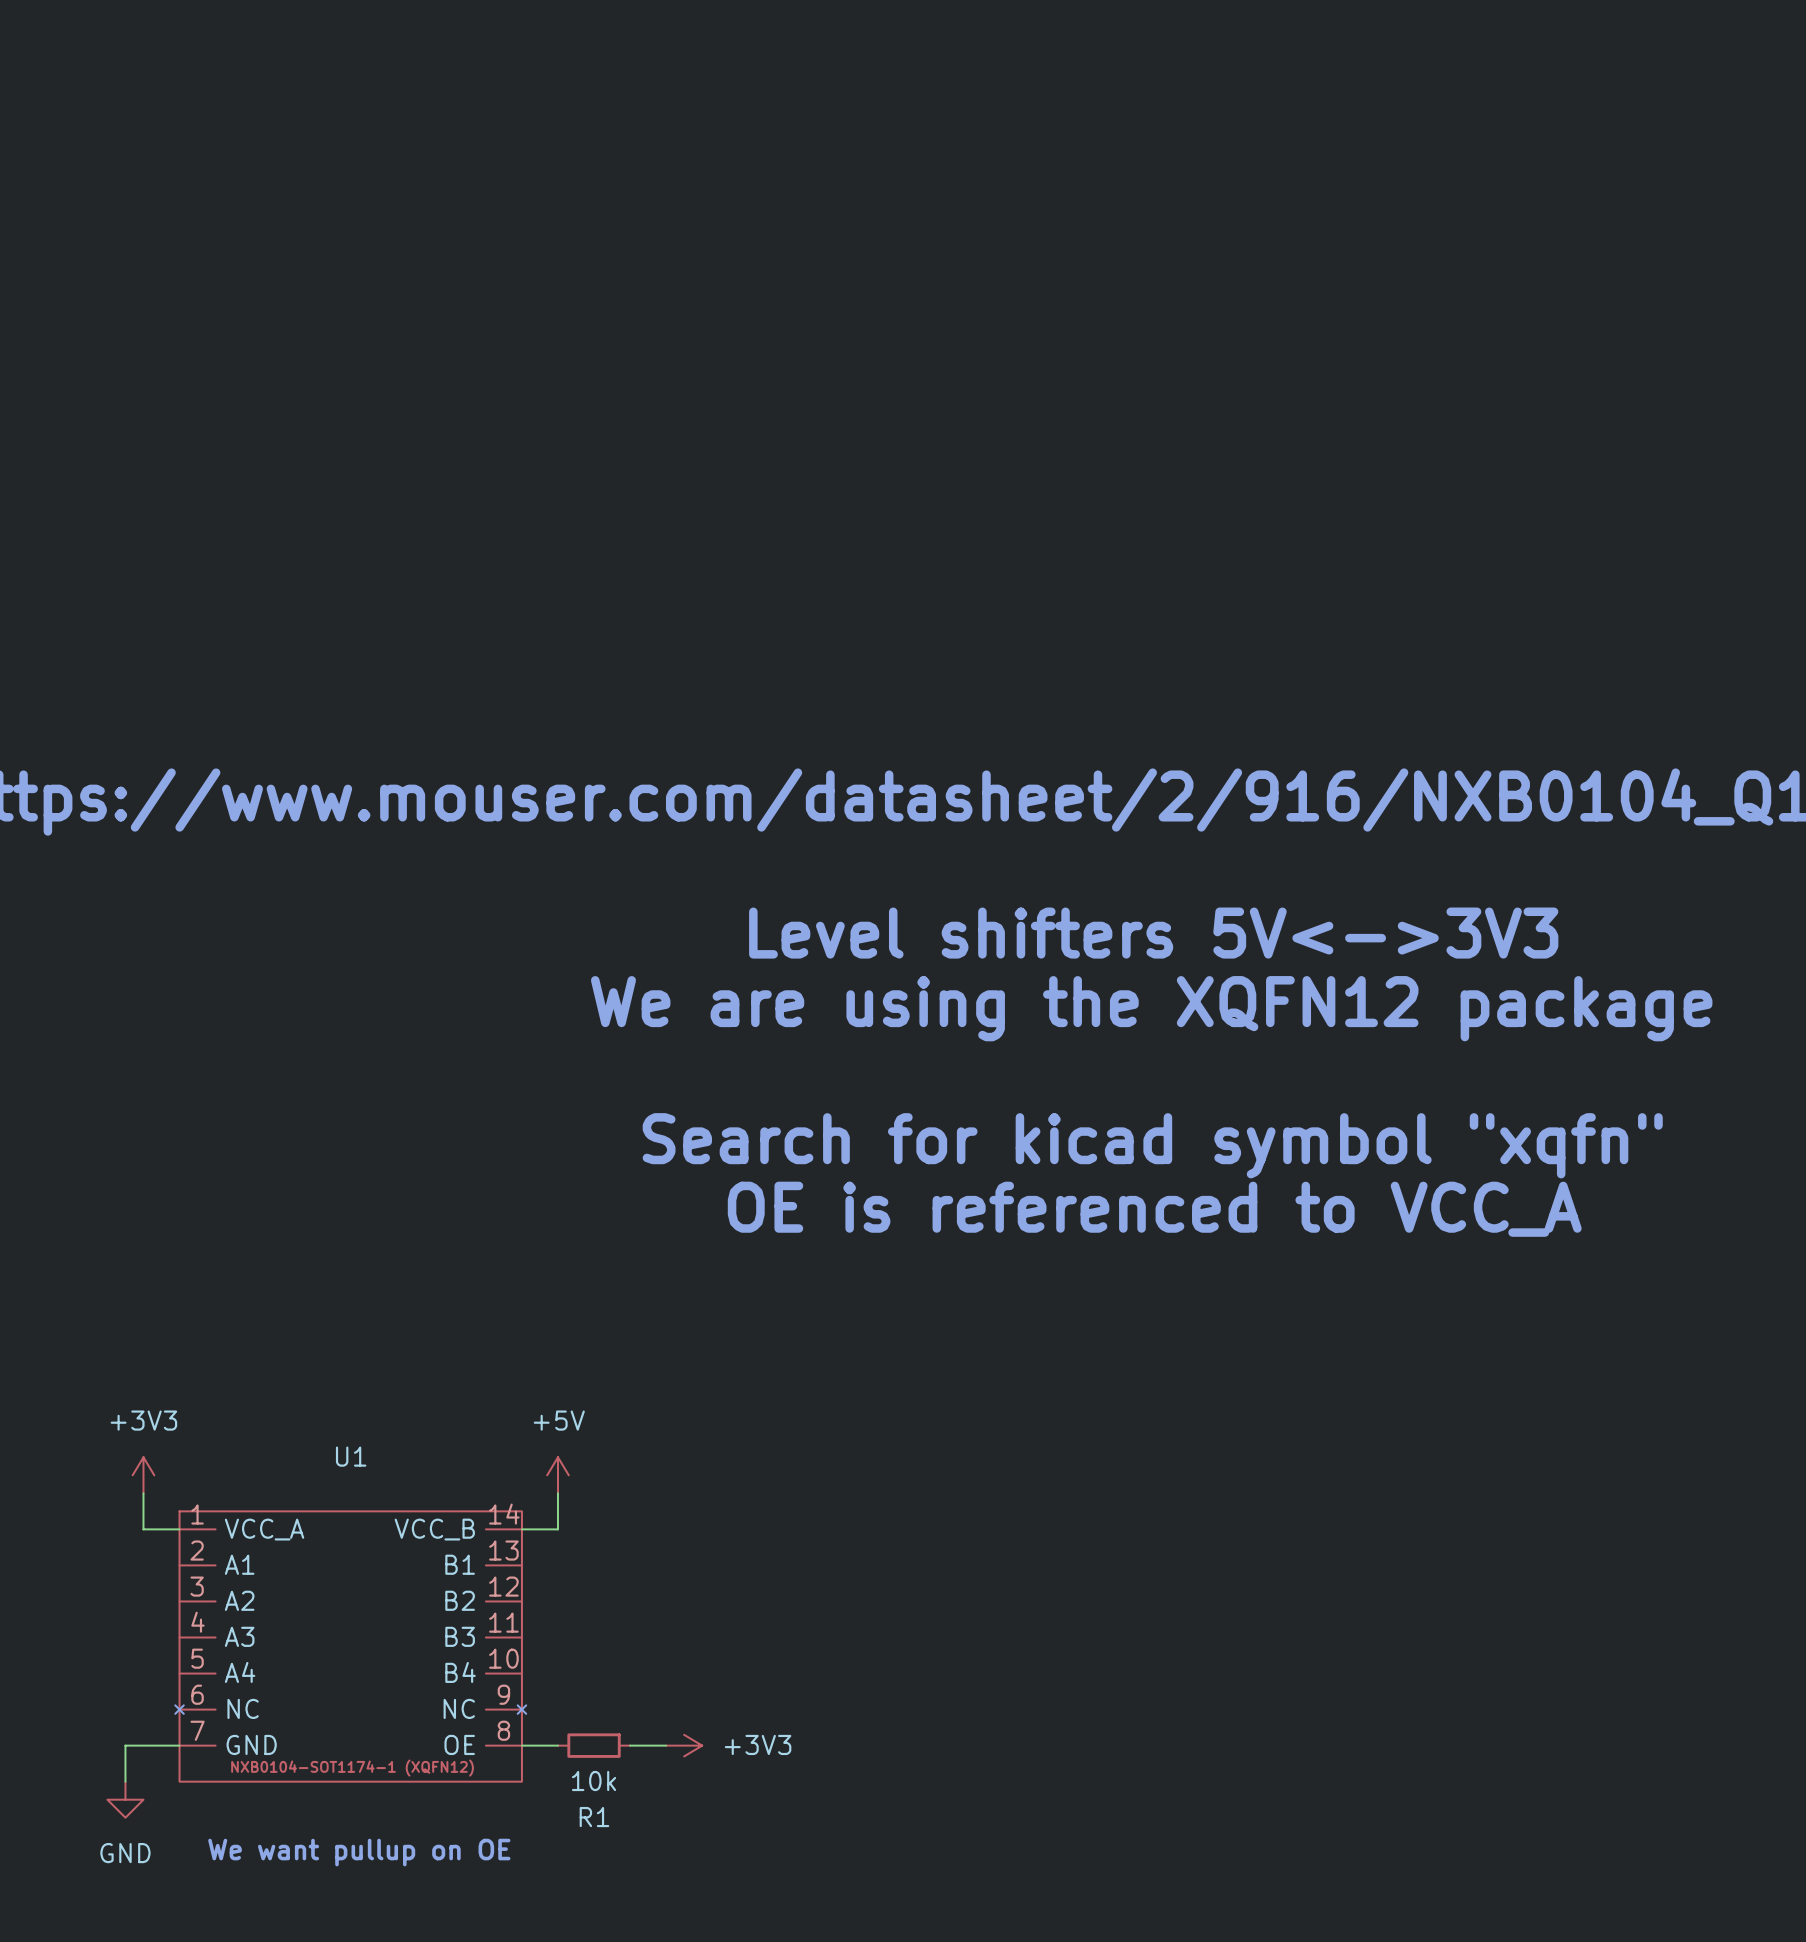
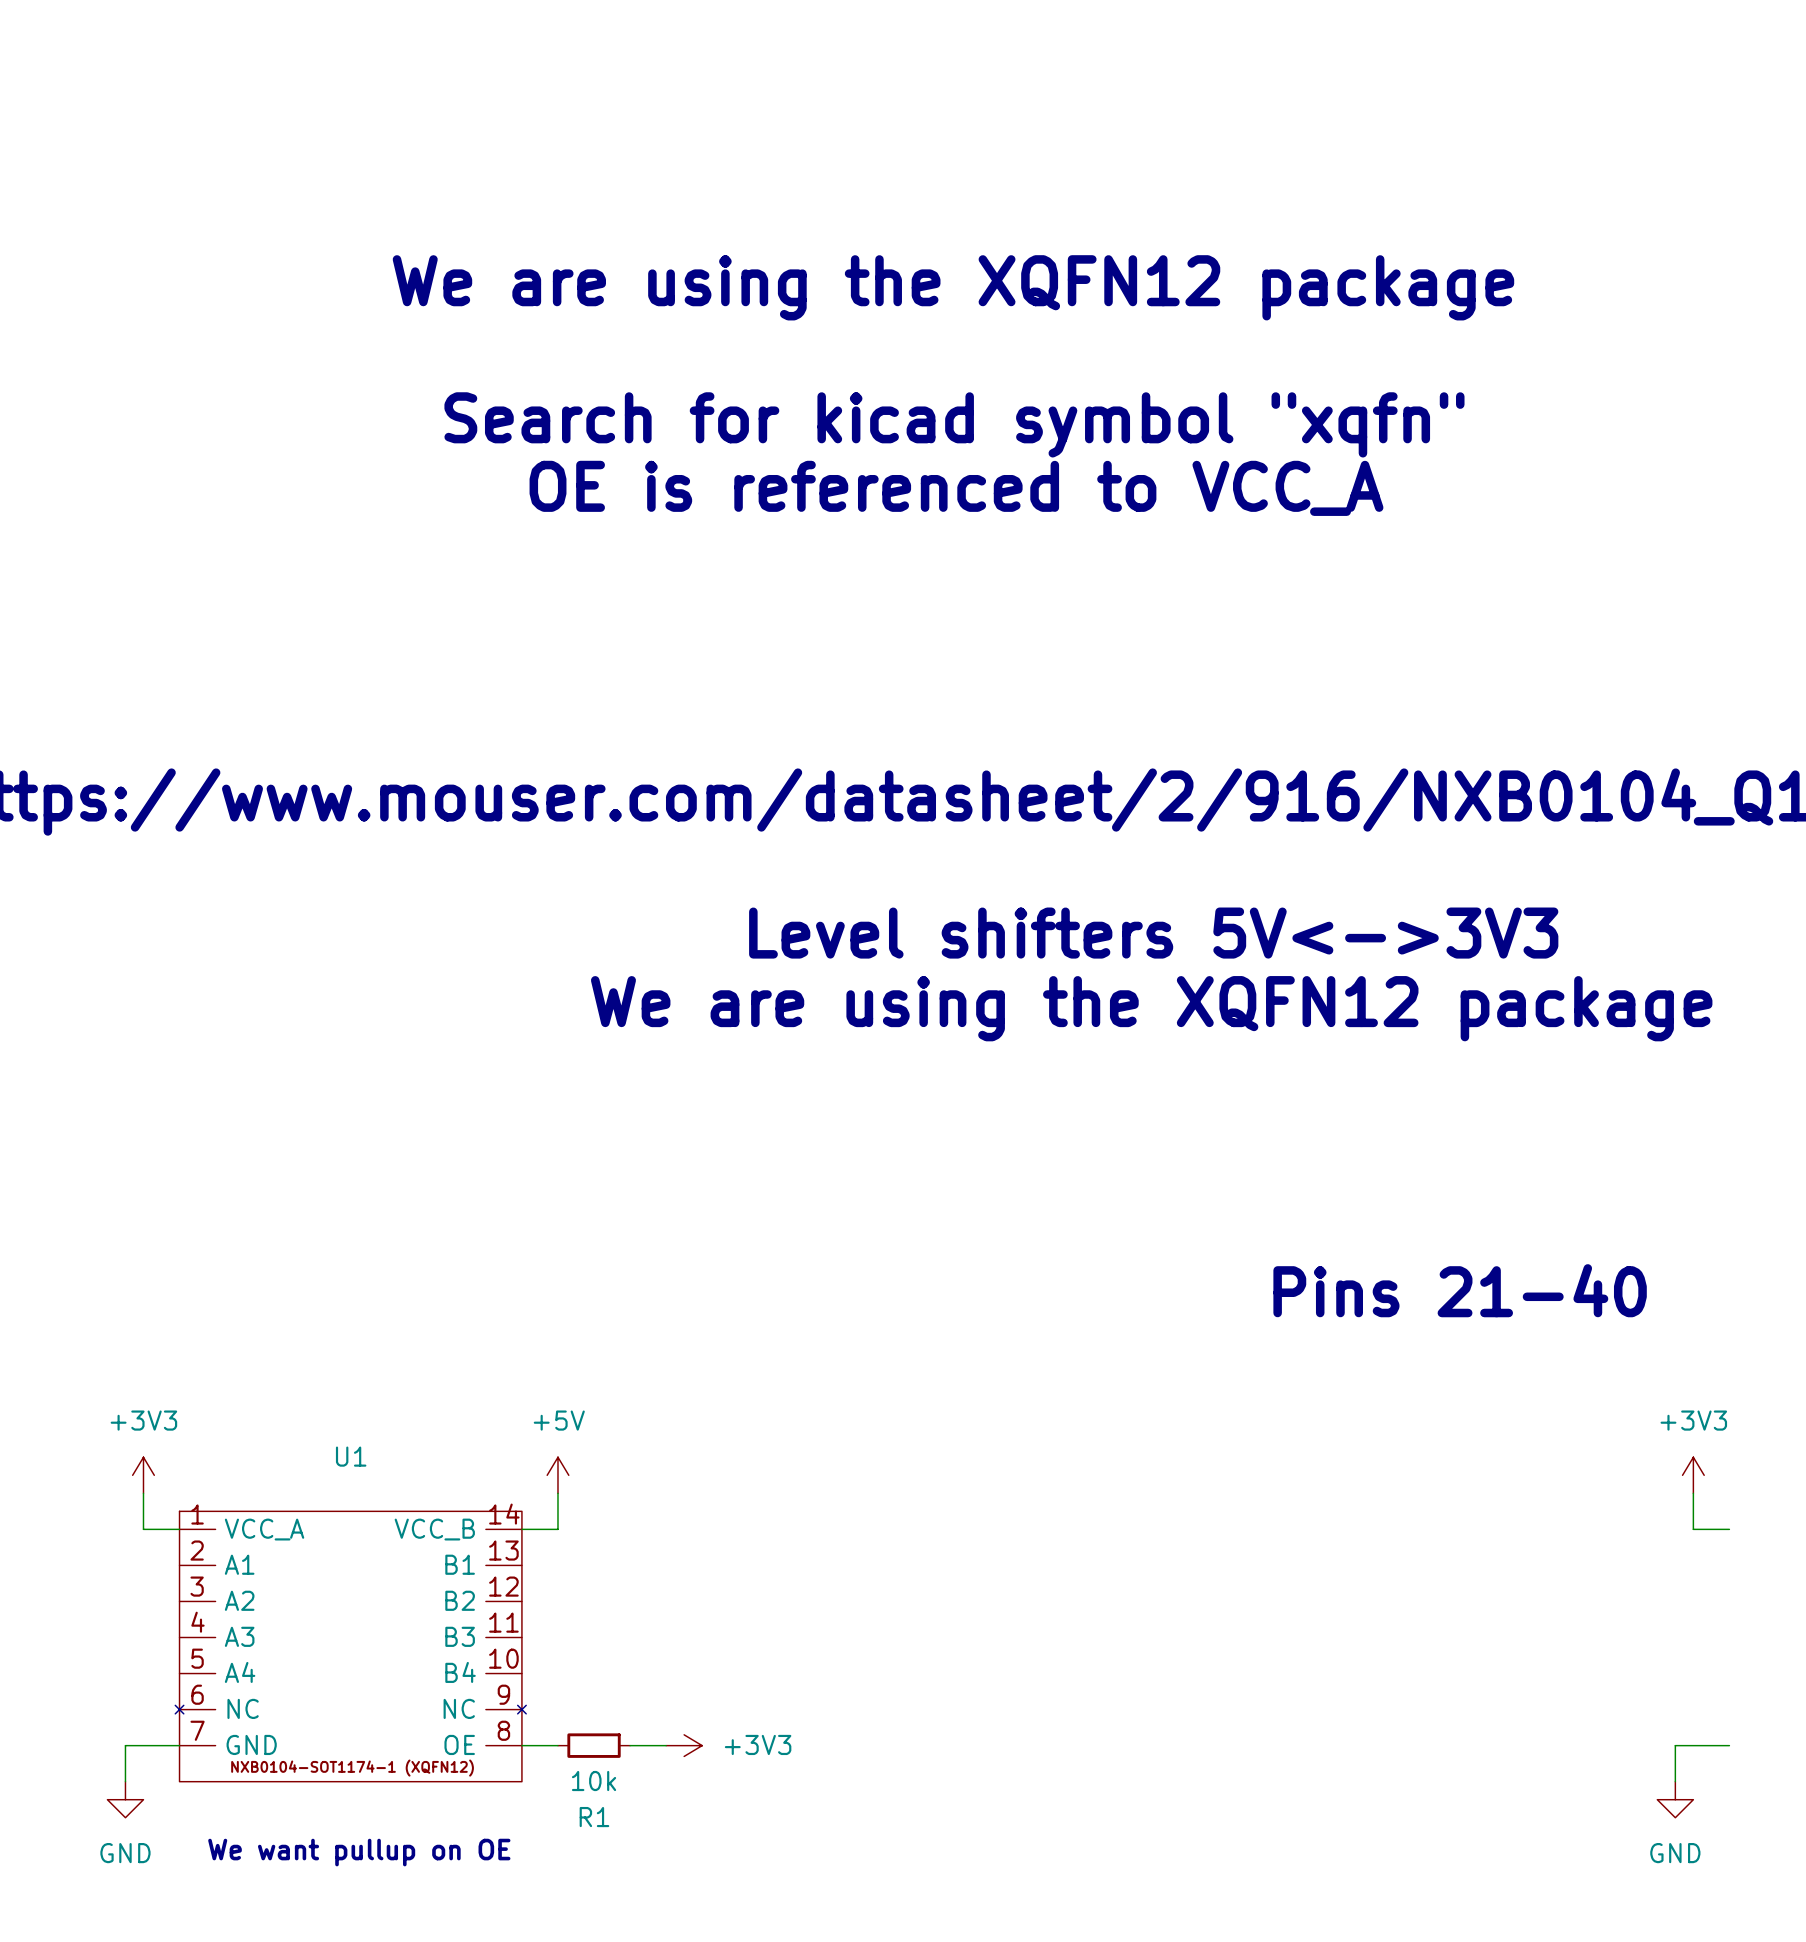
text: none -> We are using the XQFN12 package (953, 287)
text: none -> Search for kicad symbol "xqfn" (954, 424)
text: none -> OE is referenced to VCC_A (956, 488)
text: Search for kicad symbol "xqfn" (1152, 1145) -> none
text: OE is referenced to VCC_A (1154, 1209) -> none
text: none -> Pins 21-40 (1460, 1290)
power symbol: none -> +3V3 (1693, 1475)
wire: none -> (1693, 1493) (1693, 1529) (1729, 1529)
wire: none -> (1729, 1745) (1675, 1745) (1675, 1781)
power symbol: none -> GND (1675, 1799)

